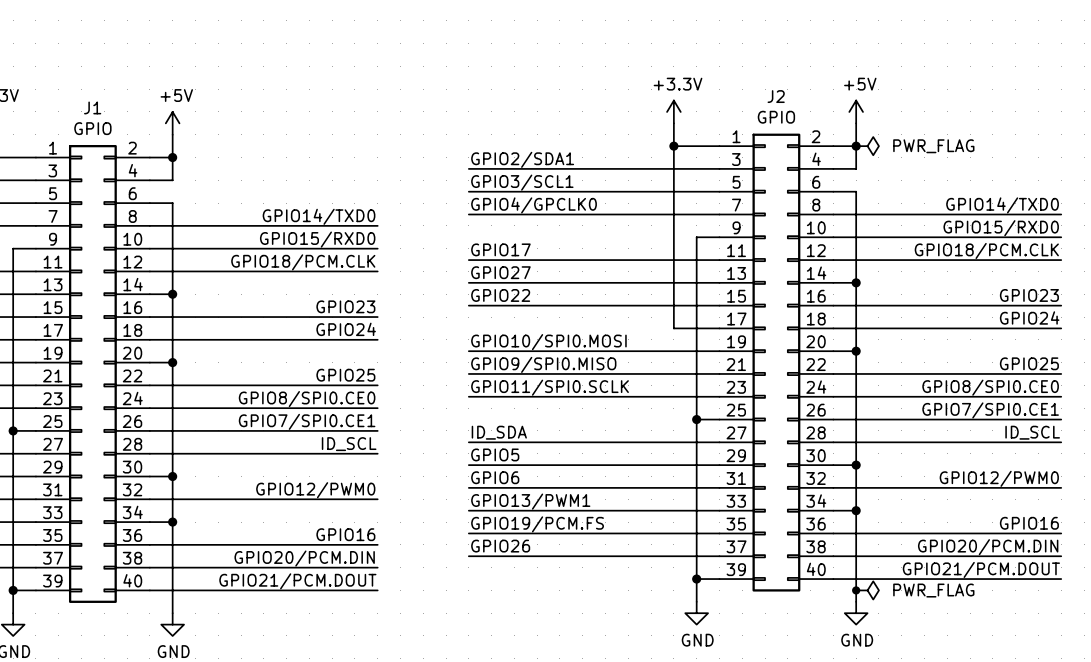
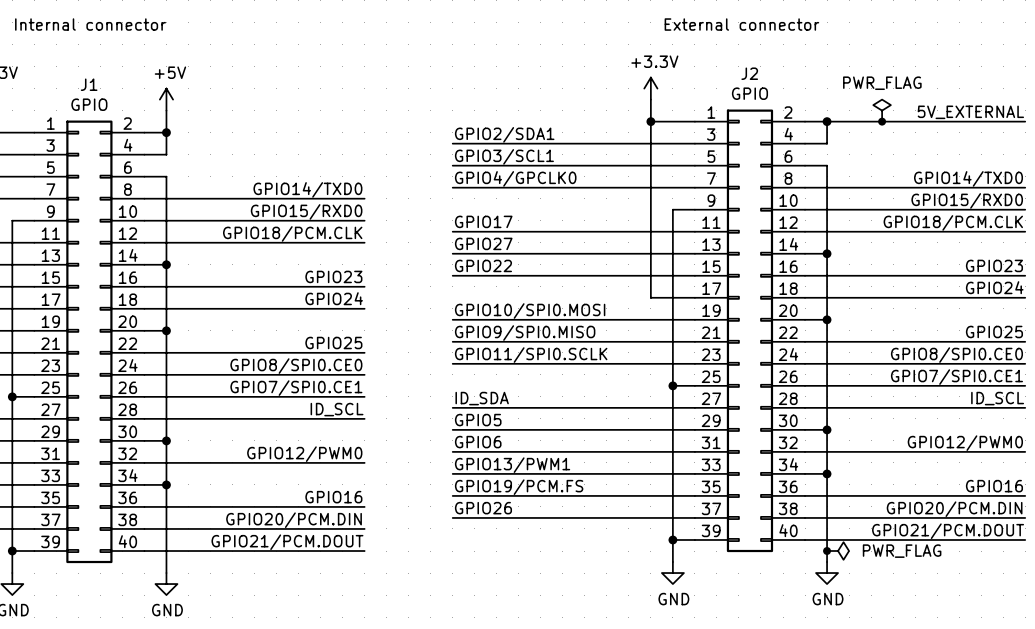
text: none -> Internal connector (90, 24)
text: none -> External connector (741, 24)
power symbol: +5V (856, 111) -> none
wire: (856, 123) (856, 146) -> (1025, 121) (827, 121)
label: none -> 5V_EXTERNAL (970, 112)
power symbol rotation: 0° (867, 146) -> 90° counterclockwise (882, 110)
power symbol position: PWR_FLAG (867, 146) -> PWR_FLAG (882, 110)
junction: none -> (882, 121)
power symbol text position: PWR_FLAG (933, 146) -> PWR_FLAG (882, 83)

